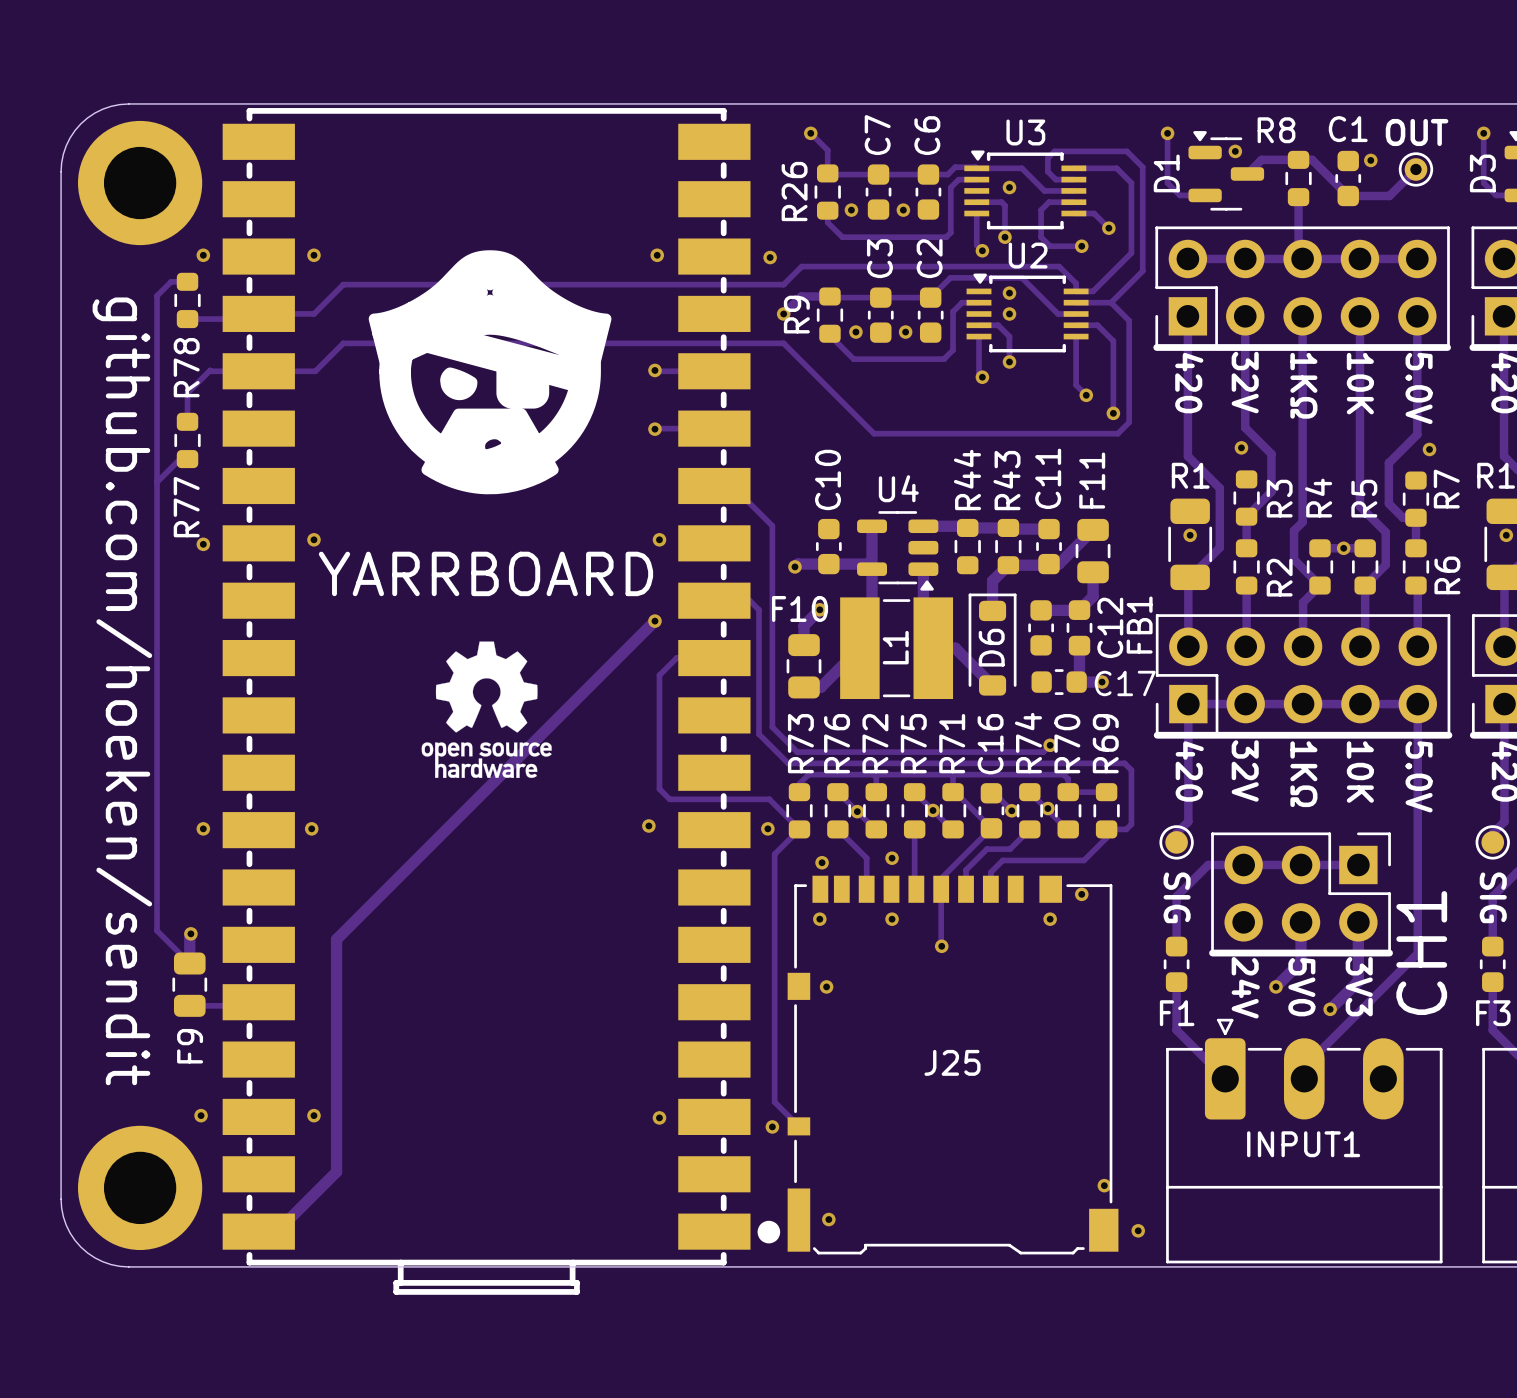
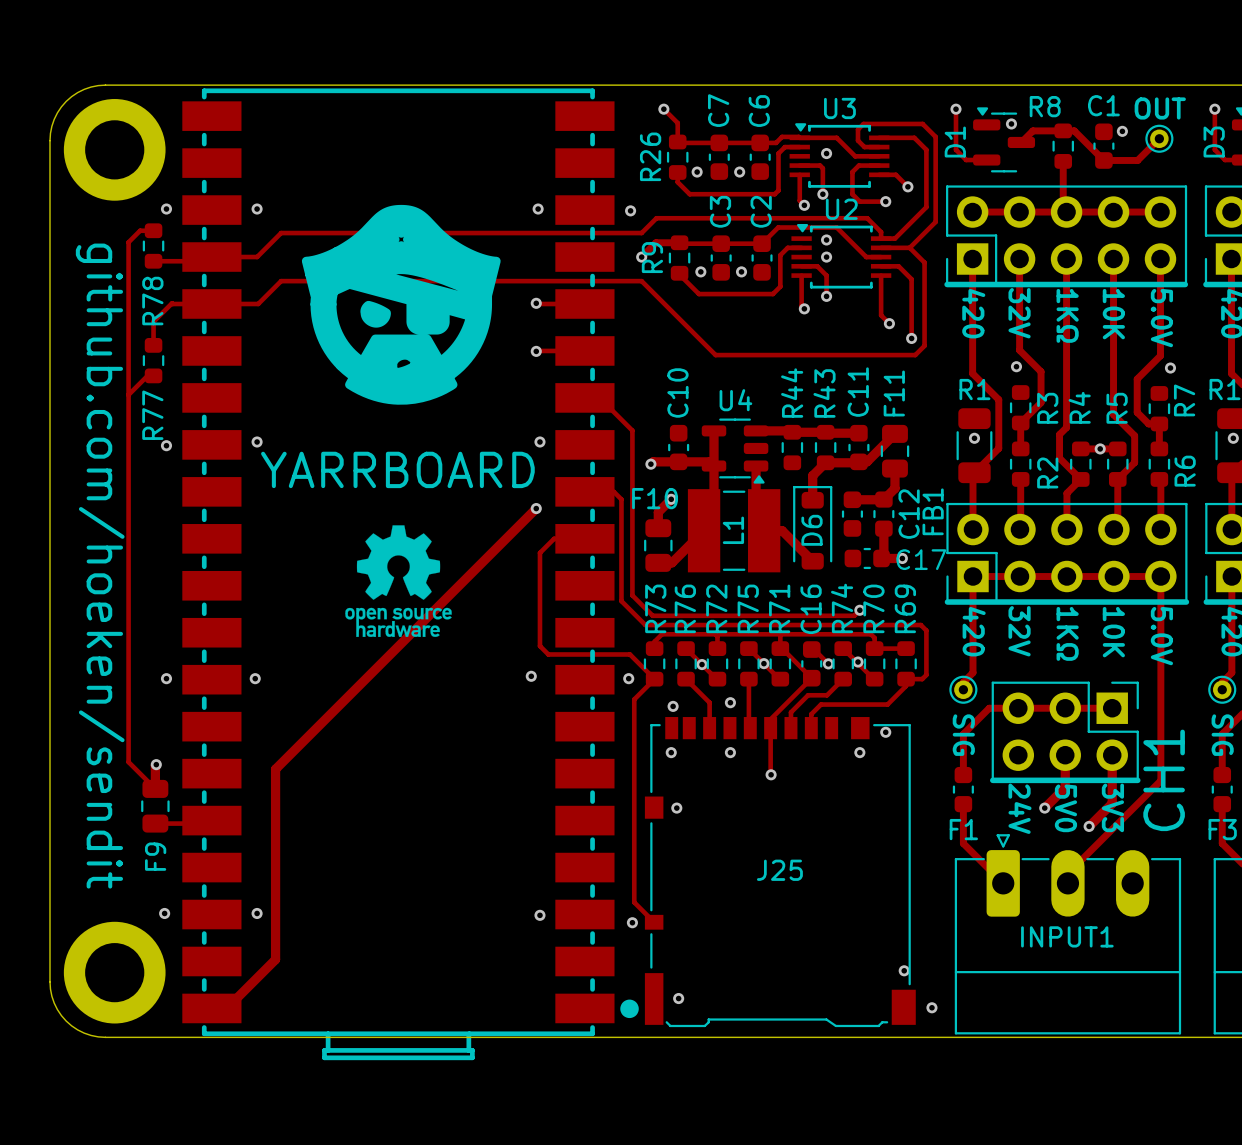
part footprint: [1159, 825, 1194, 860] -> [949, 675, 978, 704]
part footprint: [1475, 825, 1510, 860] -> [1208, 675, 1237, 704]

